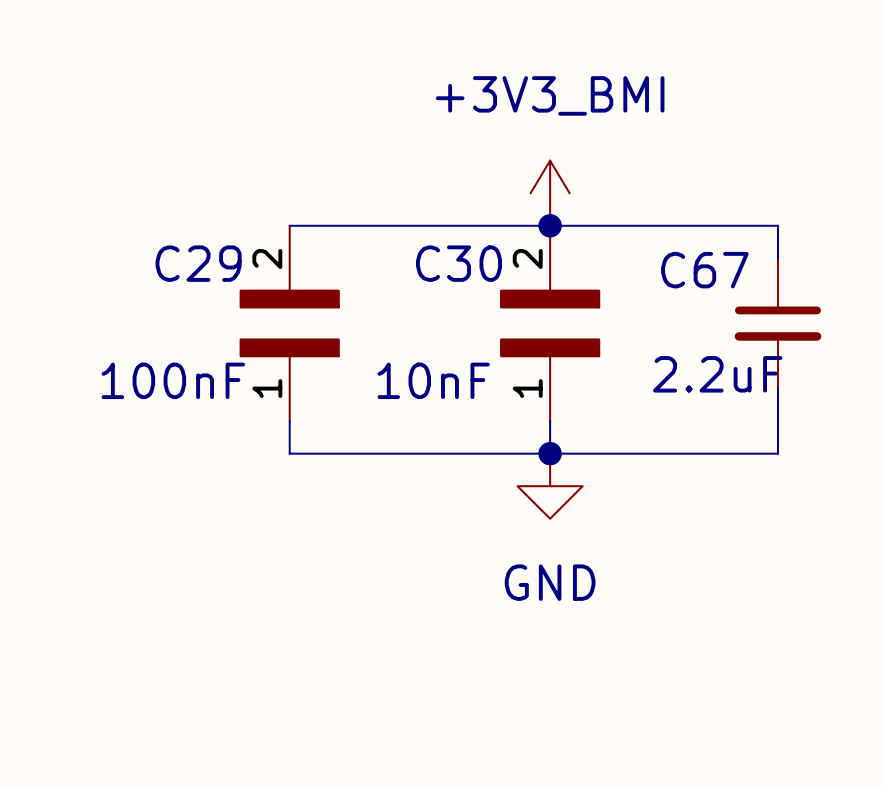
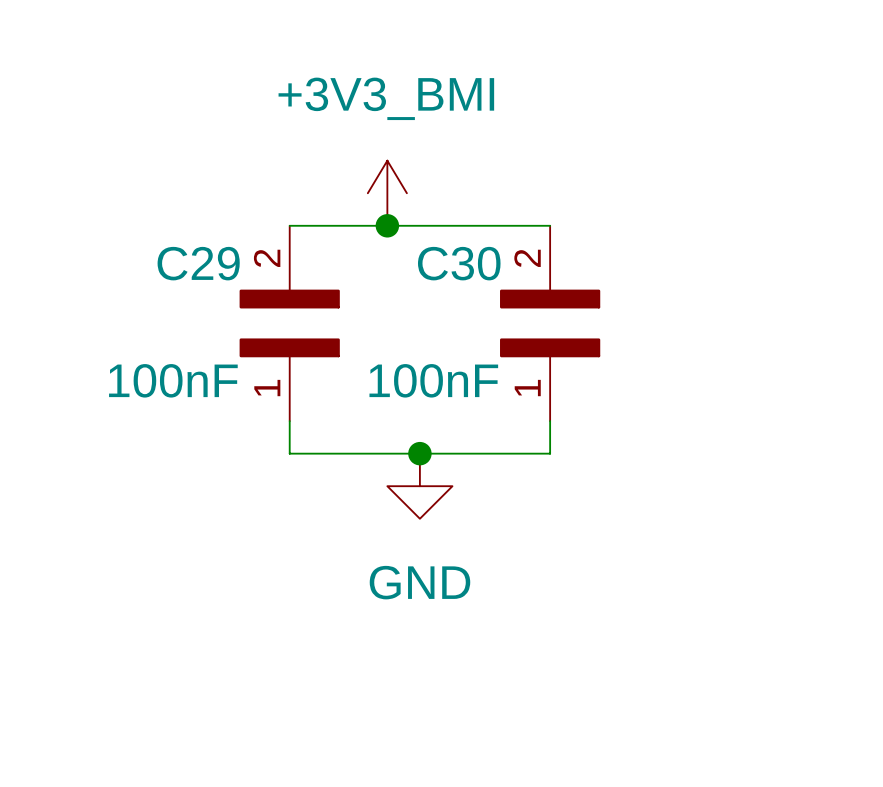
power symbol position: +3V3_BMI (550, 193) -> +3V3_BMI (387, 193)
junction: none -> (387, 225)
wire: (550, 225) (777, 225) (777, 258) -> none
junction: (550, 225) -> none
C67: 2.2uF (777, 323) -> none
C30 value: 10nF (433, 380) -> 100nF (433, 380)
wire: (777, 388) (777, 453) (550, 453) -> none
junction position: (550, 453) -> (419, 453)
power symbol position: GND (550, 486) -> GND (419, 486)

